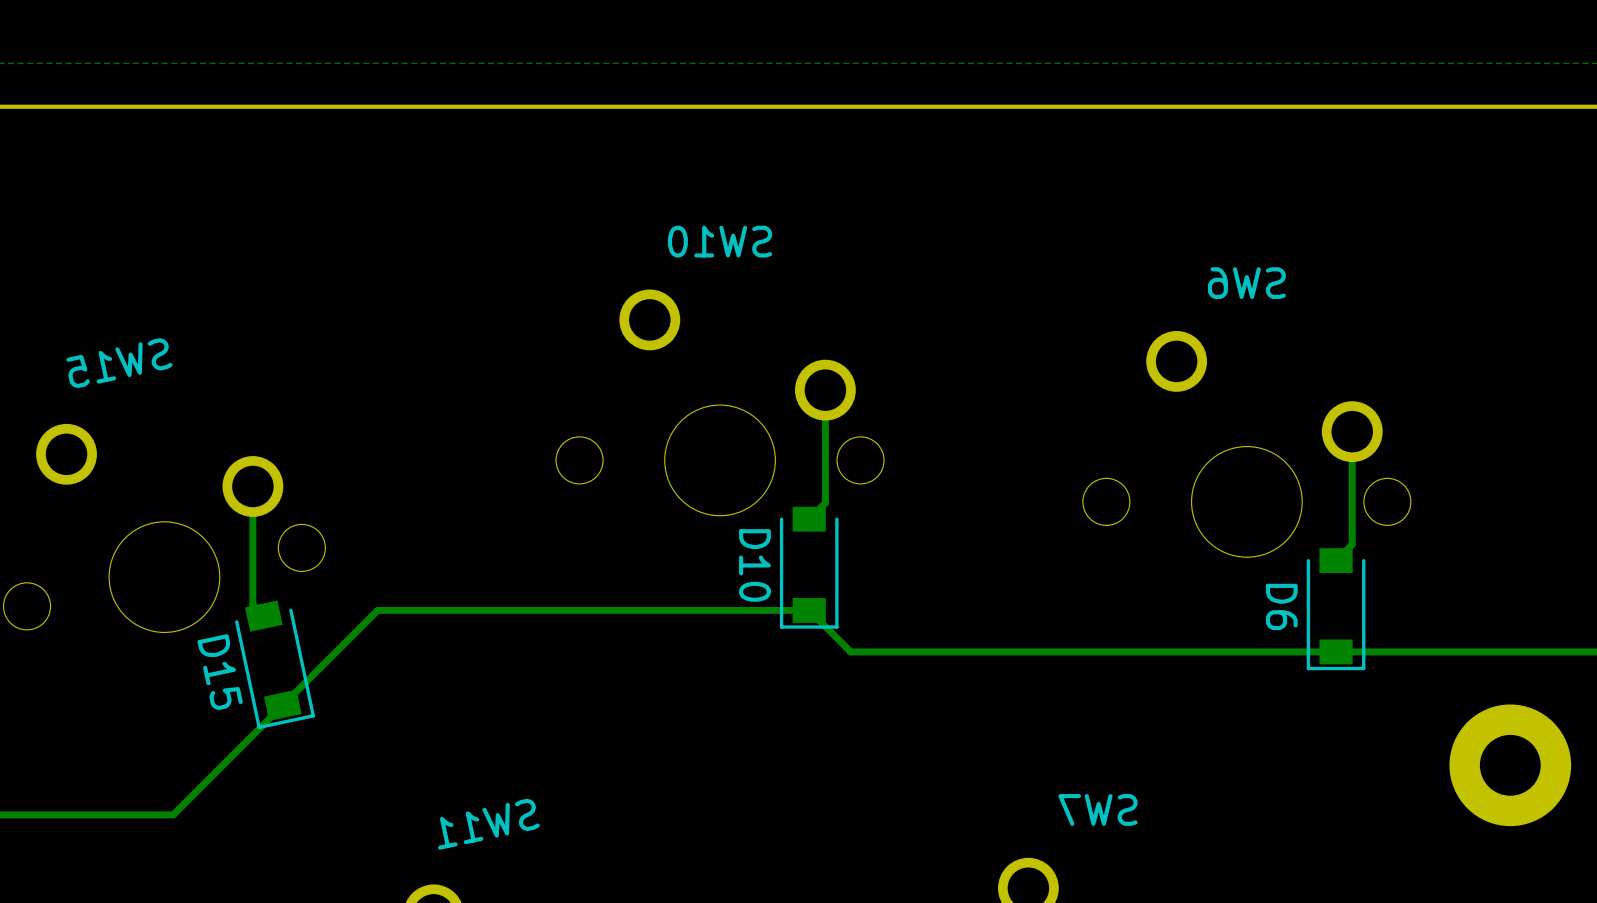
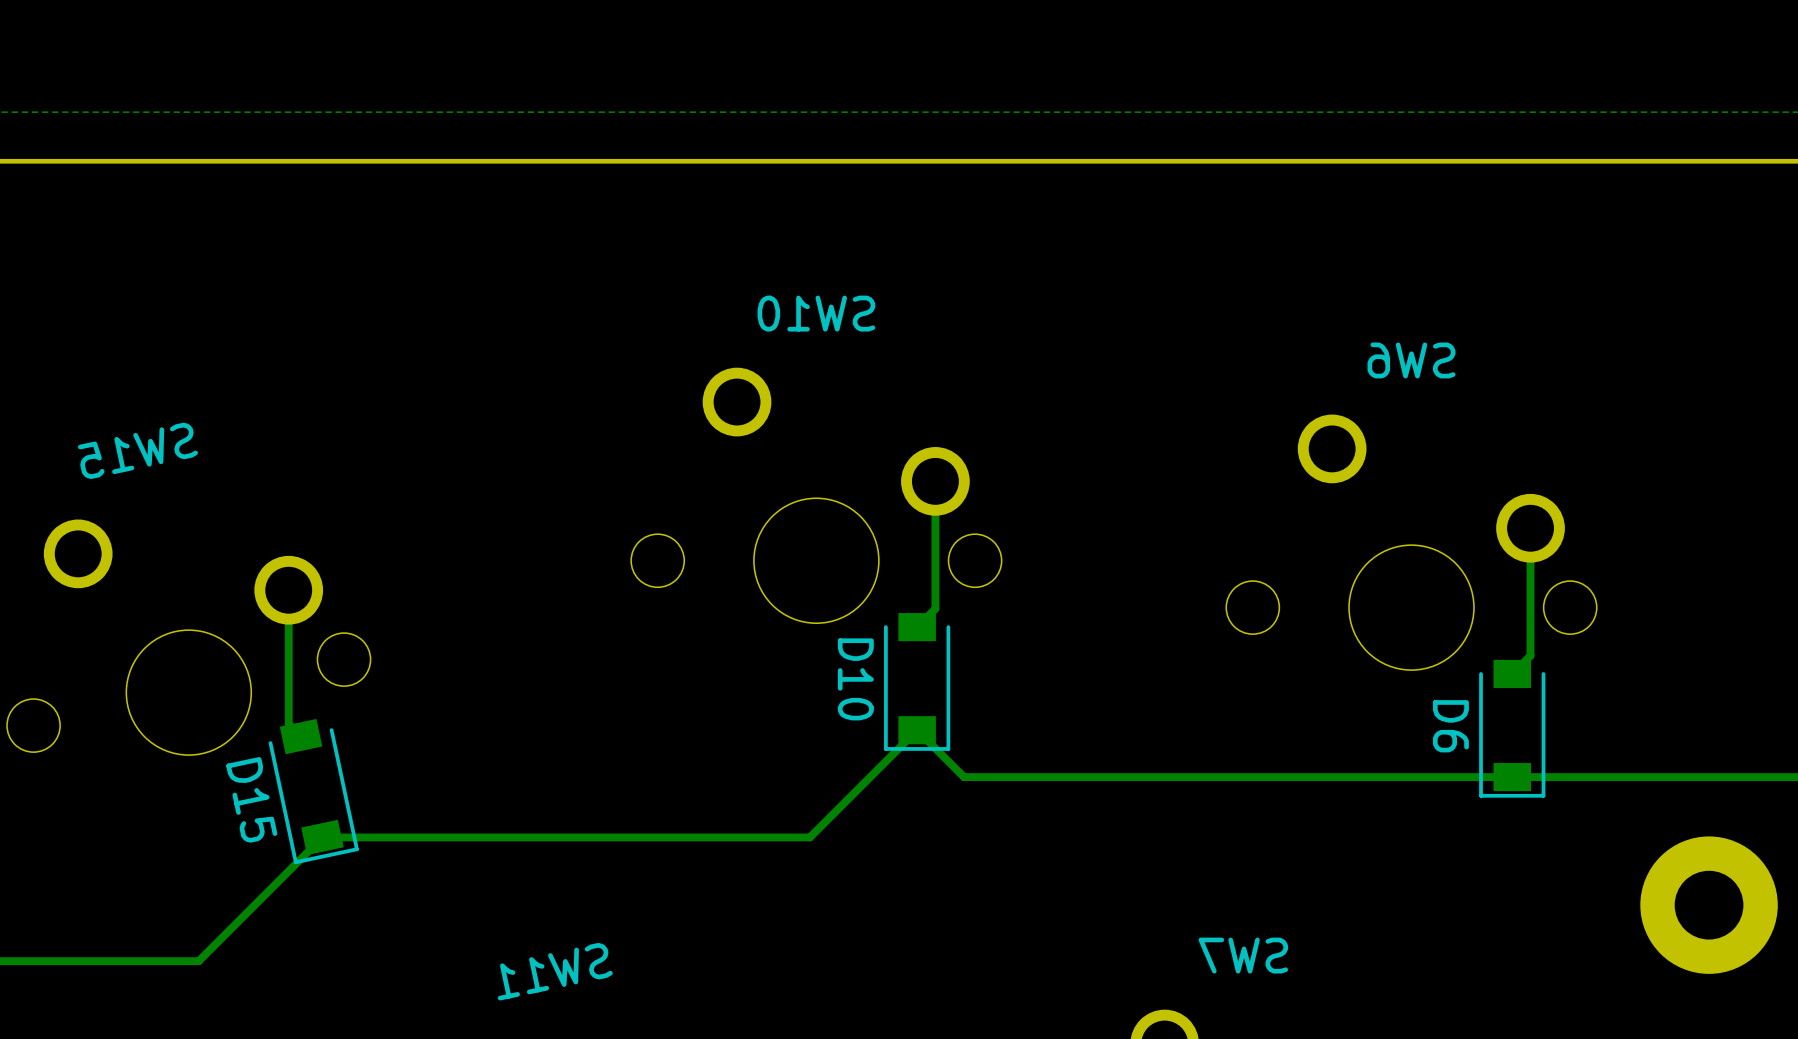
track: (809, 610) (377, 610) (282, 705) -> (917, 730) (809, 837) (322, 837)

